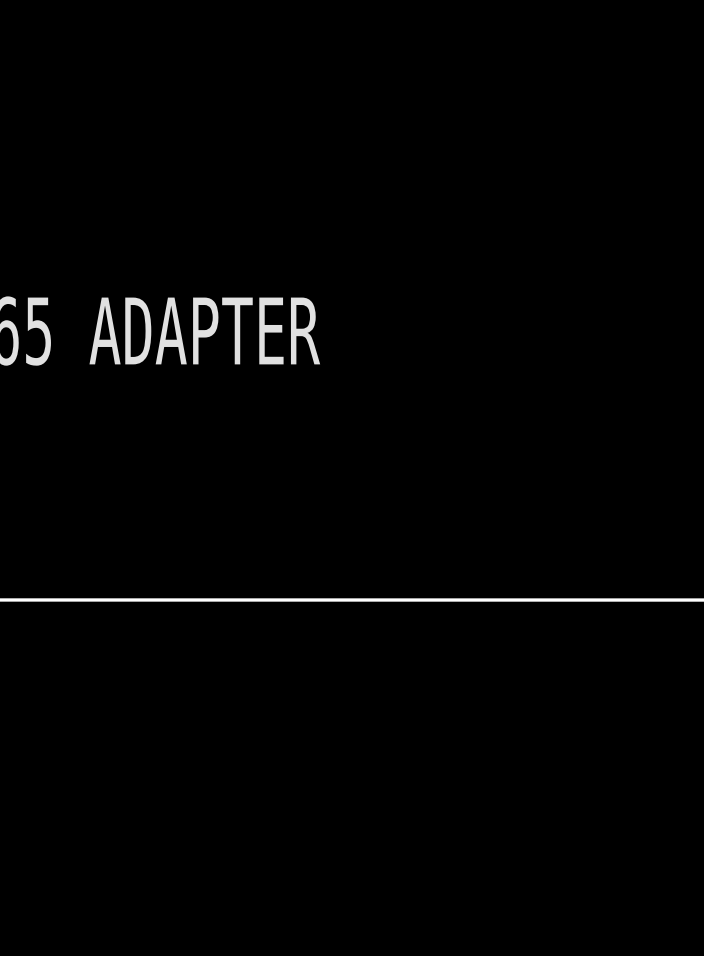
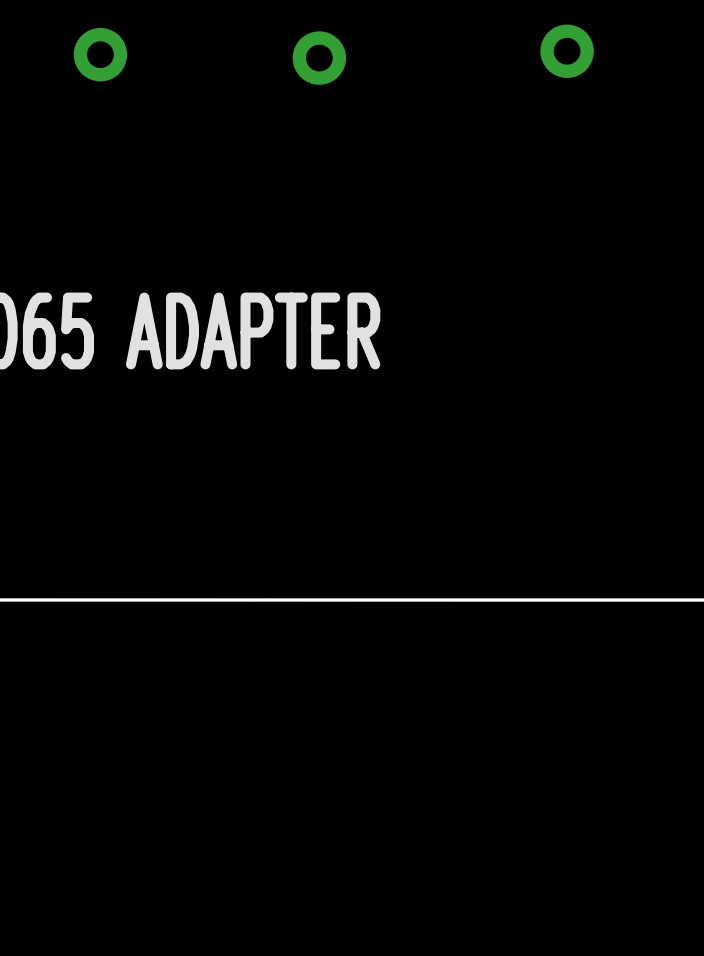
via: none -> (567, 51)
via: none -> (100, 54)
via: none -> (319, 58)

